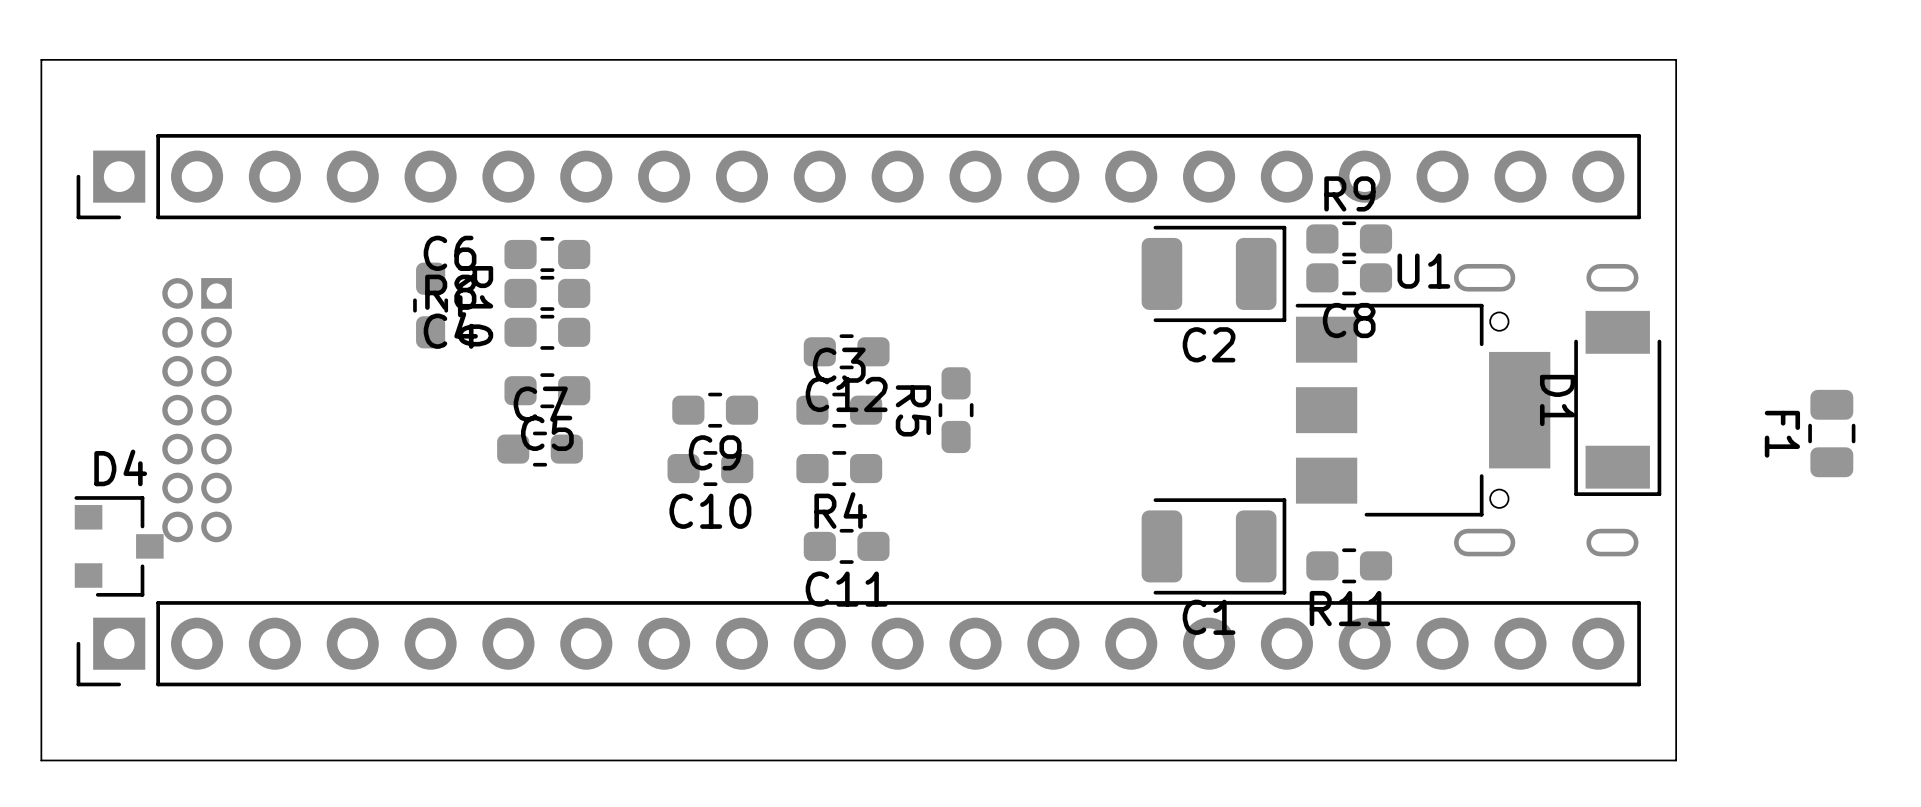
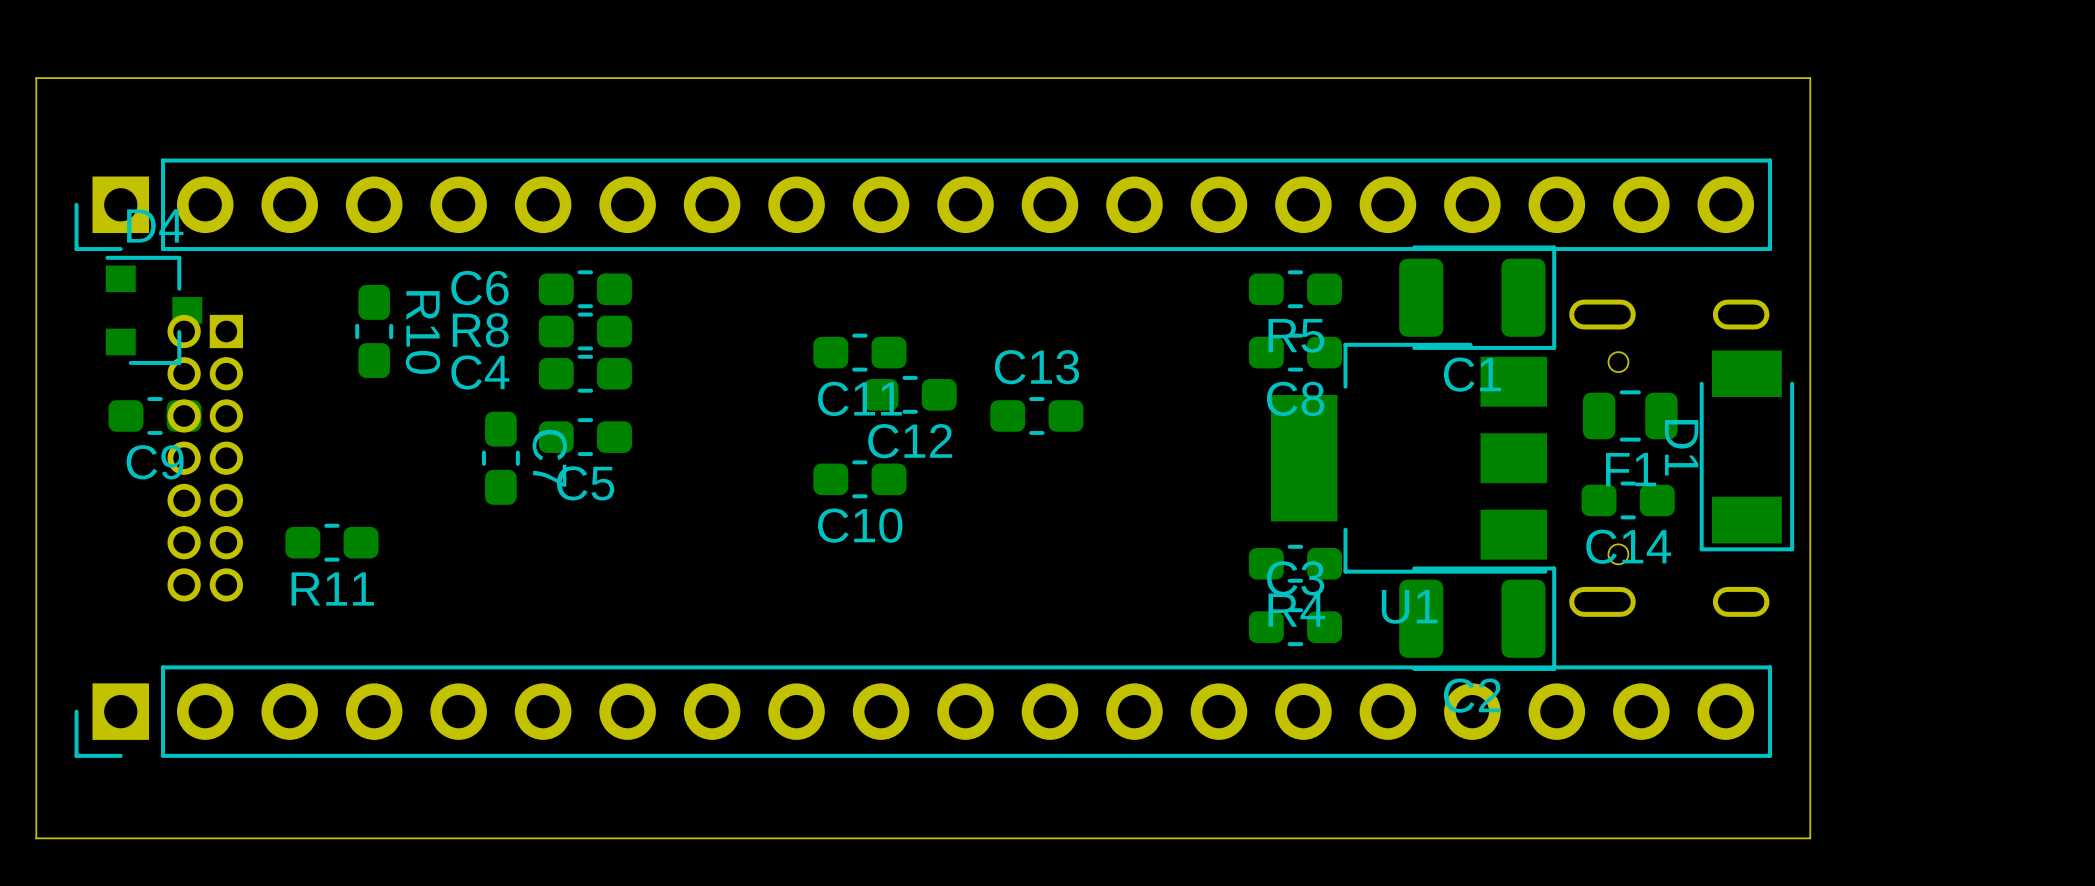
R9: (1349, 238) -> none
C2 position: (1213, 273) -> (1477, 618)
C8 position: (1349, 277) -> (1295, 352)
R10 position: (430, 305) -> (374, 331)
C13: none -> (1036, 415)
C9 position: (715, 410) -> (155, 415)
C3 position: (839, 410) -> (1295, 627)
R5 name position: R5 (913, 410) -> R5 (1296, 335)
R5 rotation: 0° (956, 410) -> 90° clockwise (1295, 289)
R5 position: (956, 410) -> (1295, 289)
U1 rotation: 0° (1422, 410) -> 180° (1409, 458)
F1 rotation: 0° (1831, 433) -> 90° clockwise (1630, 415)
F1 position: (1831, 433) -> (1630, 415)
F1 name position: F1 (1782, 434) -> F1 (1631, 469)
C7 rotation: 0° (540, 449) -> 90° clockwise (500, 458)
C7 position: (540, 449) -> (500, 458)
C14: none -> (1628, 500)
C10 position: (710, 468) -> (859, 479)
R4 position: (839, 468) -> (1295, 563)
D4 position: (119, 546) -> (153, 310)
C11 position: (846, 546) -> (859, 352)
C1 position: (1213, 546) -> (1477, 297)
R11 position: (1349, 565) -> (331, 542)

